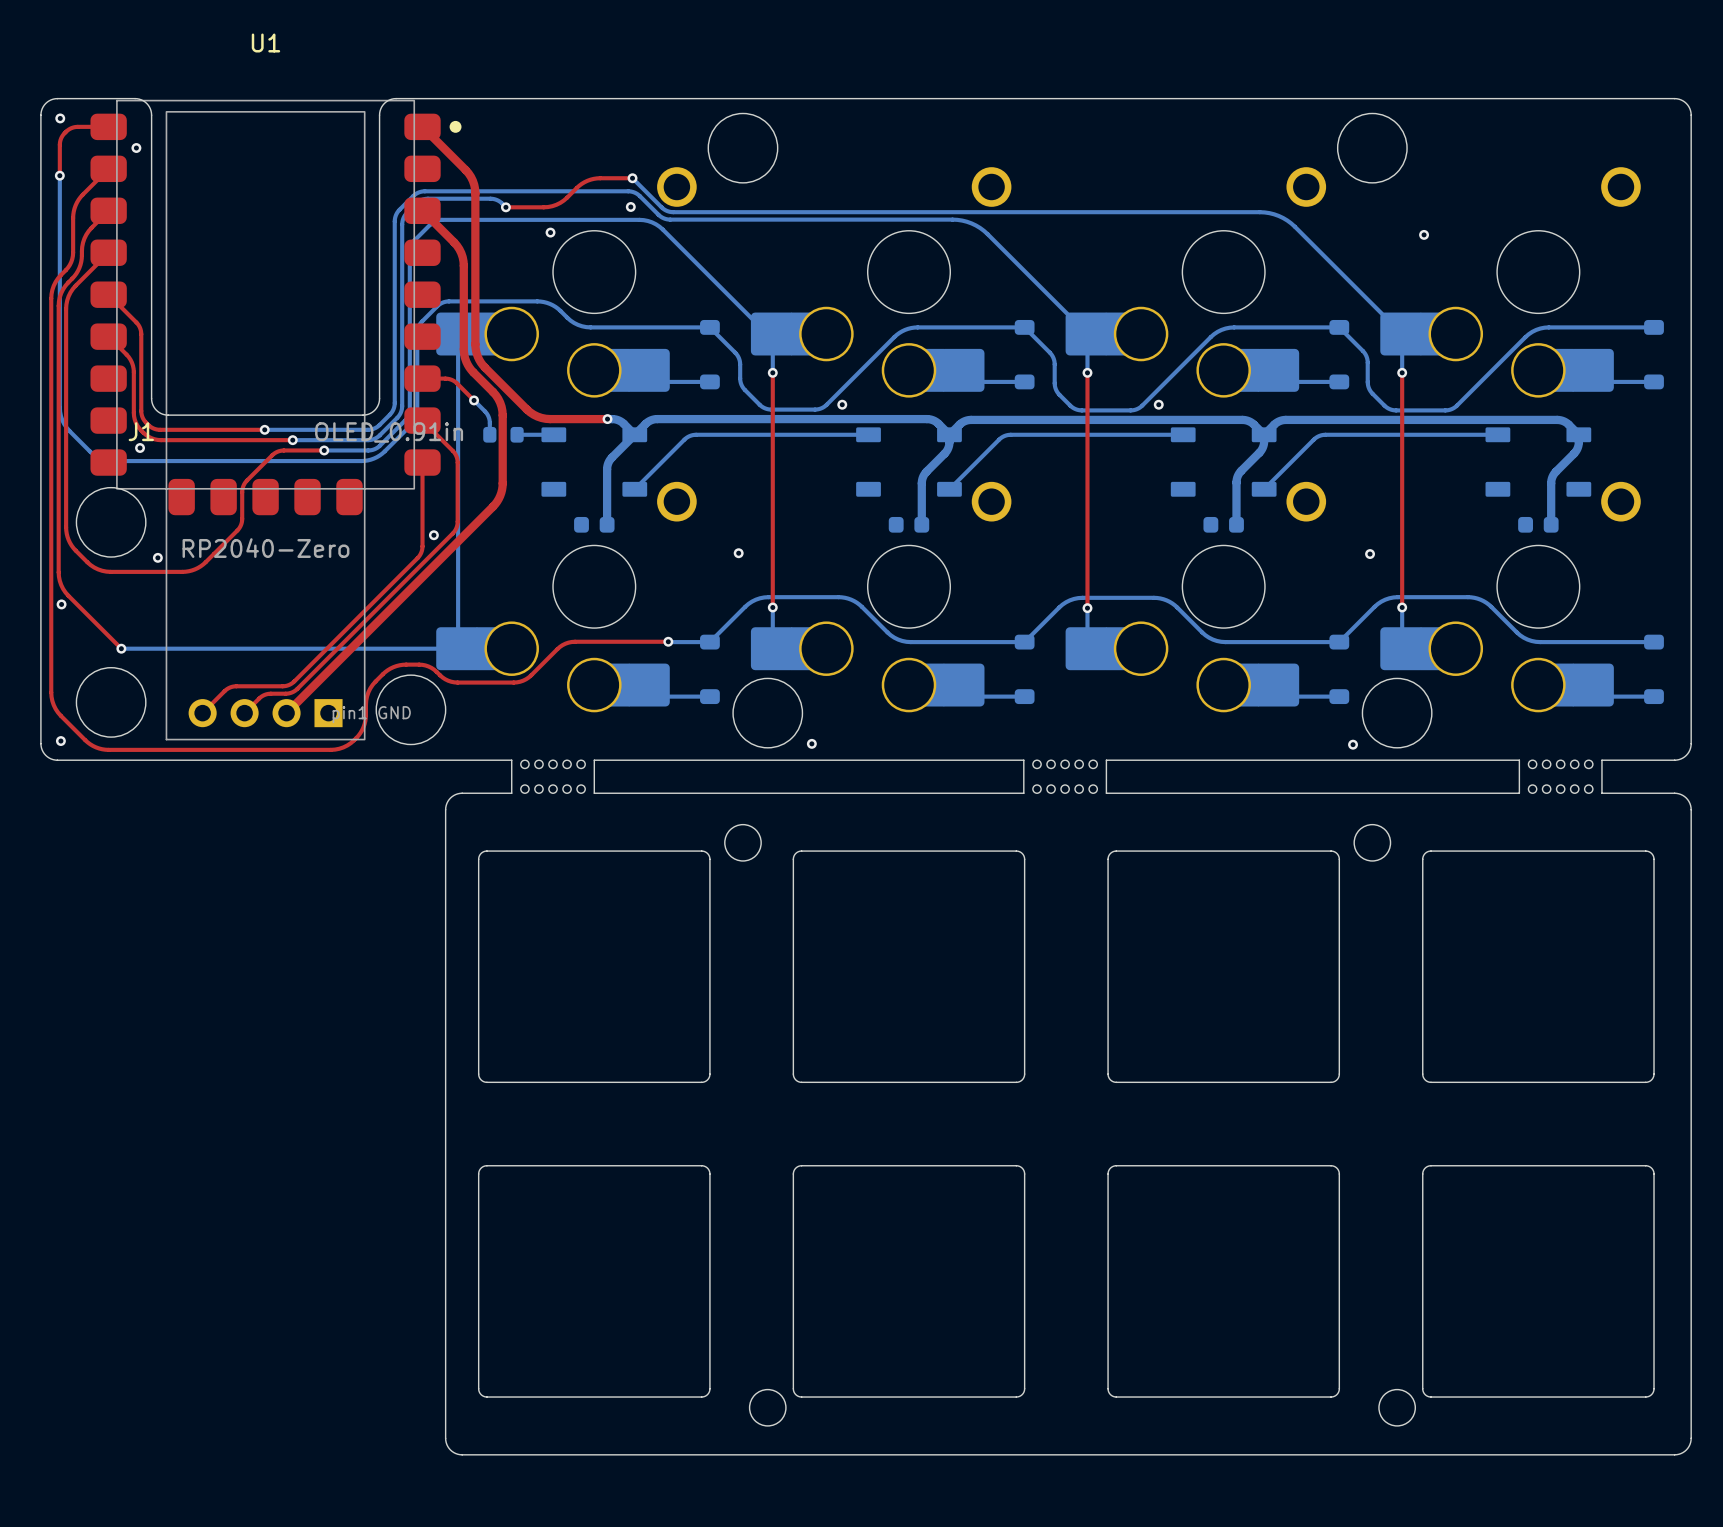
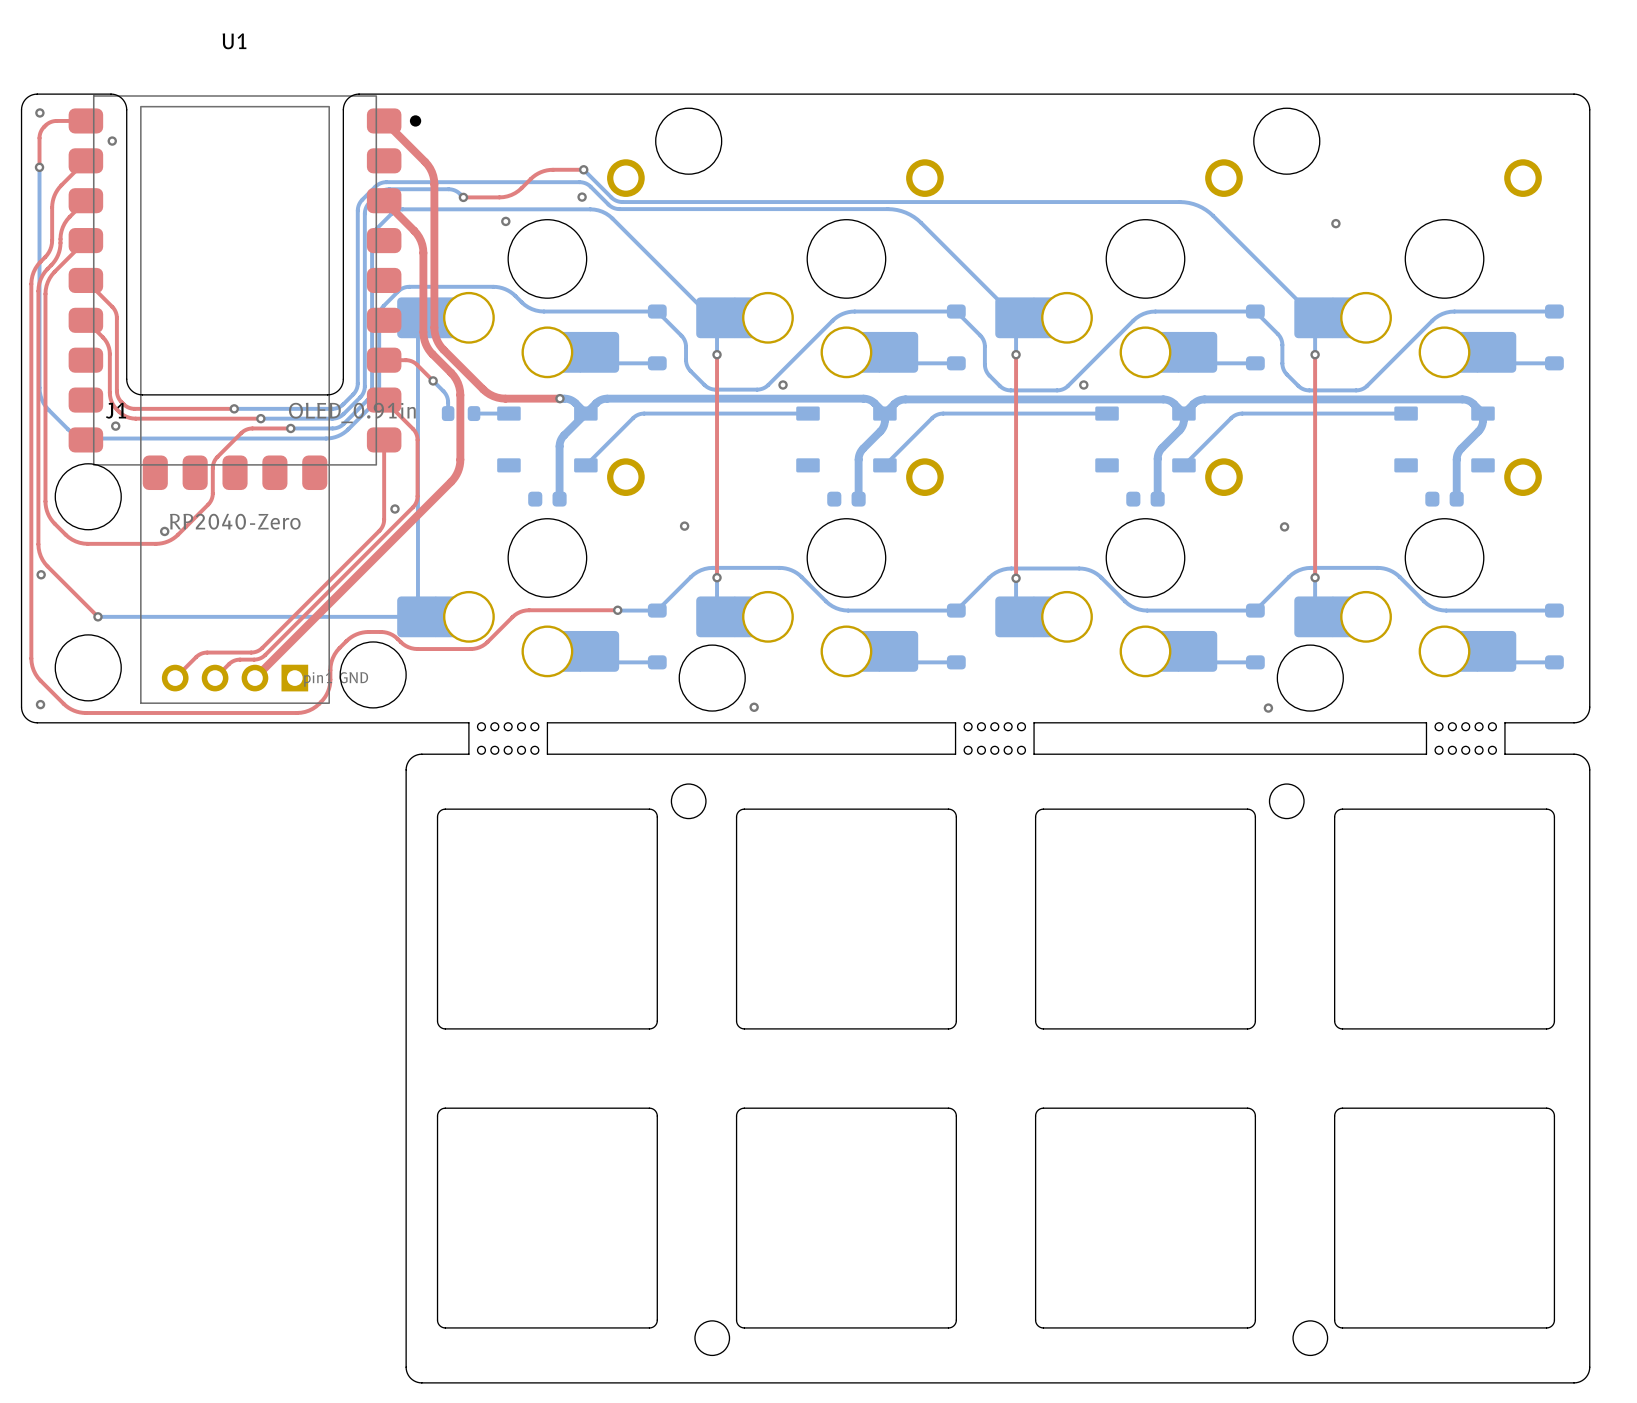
via position: (157, 557) -> (164, 531)

